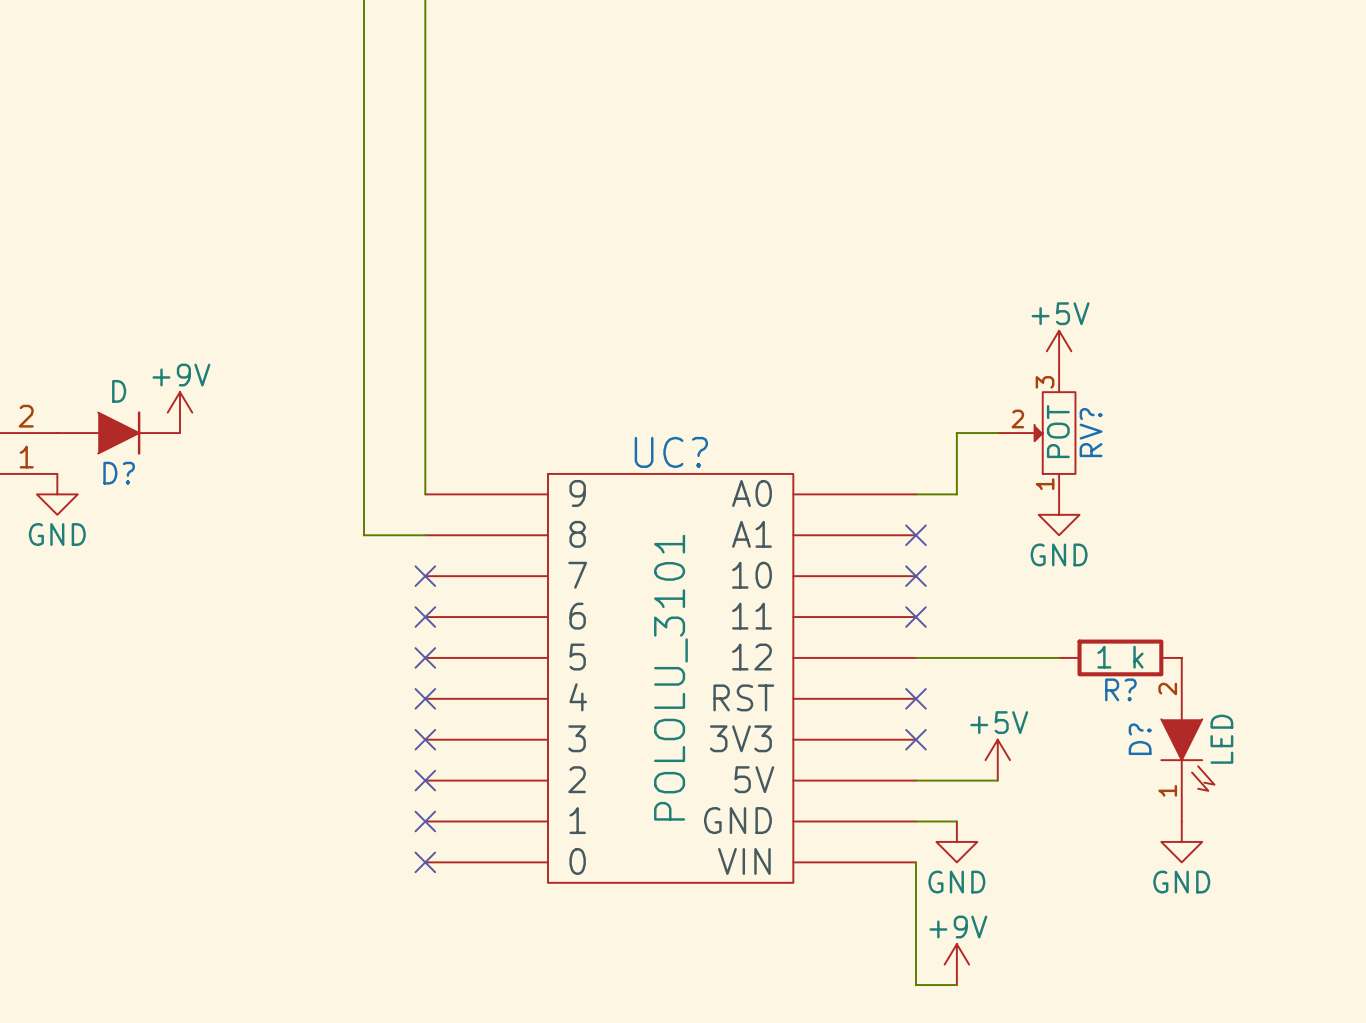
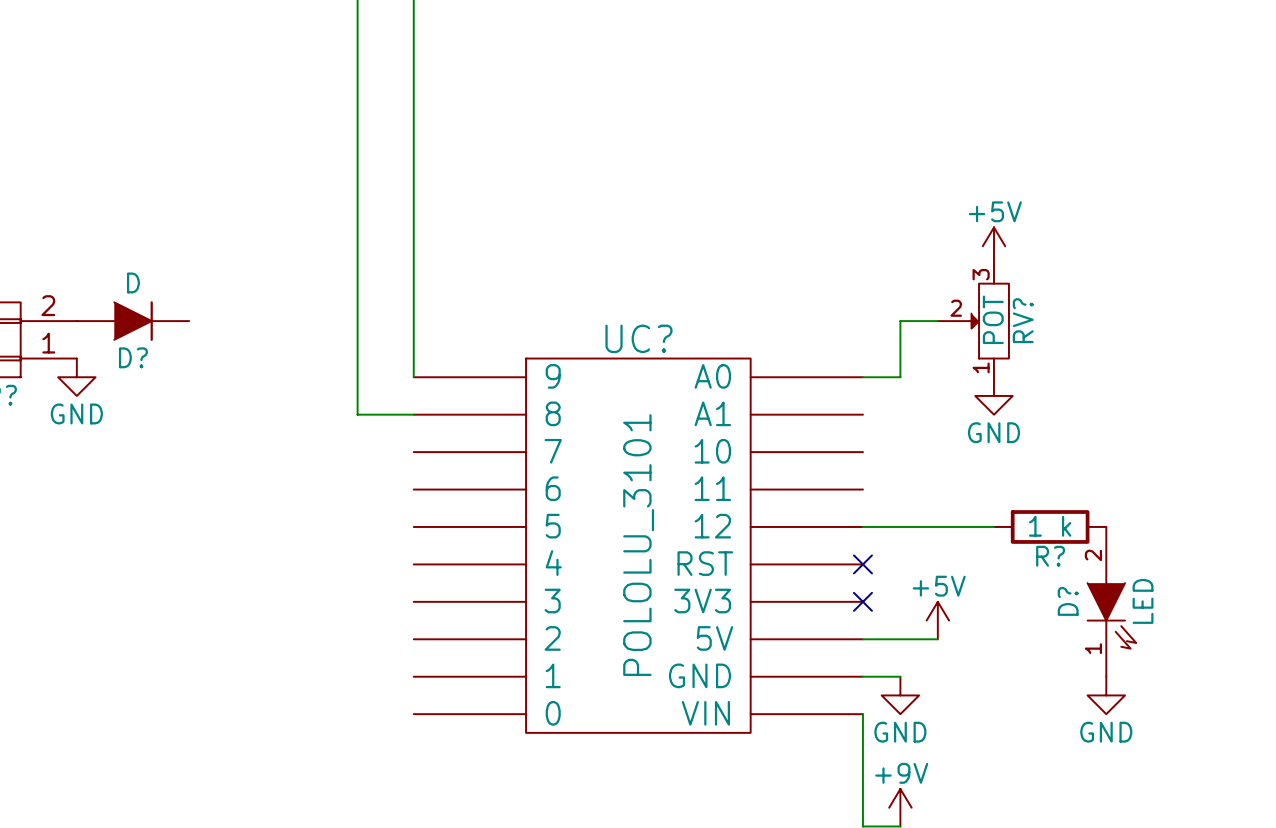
power symbol: +9V (179, 412) -> none
no-connect mark: (915, 535) -> none
no-connect mark: (425, 576) -> none
no-connect mark: (915, 576) -> none
no-connect mark: (425, 617) -> none
no-connect mark: (915, 617) -> none
no-connect mark: (425, 657) -> none
no-connect mark: (425, 698) -> none
no-connect mark: (425, 739) -> none
no-connect mark: (425, 780) -> none
no-connect mark: (425, 821) -> none
no-connect mark: (425, 862) -> none

